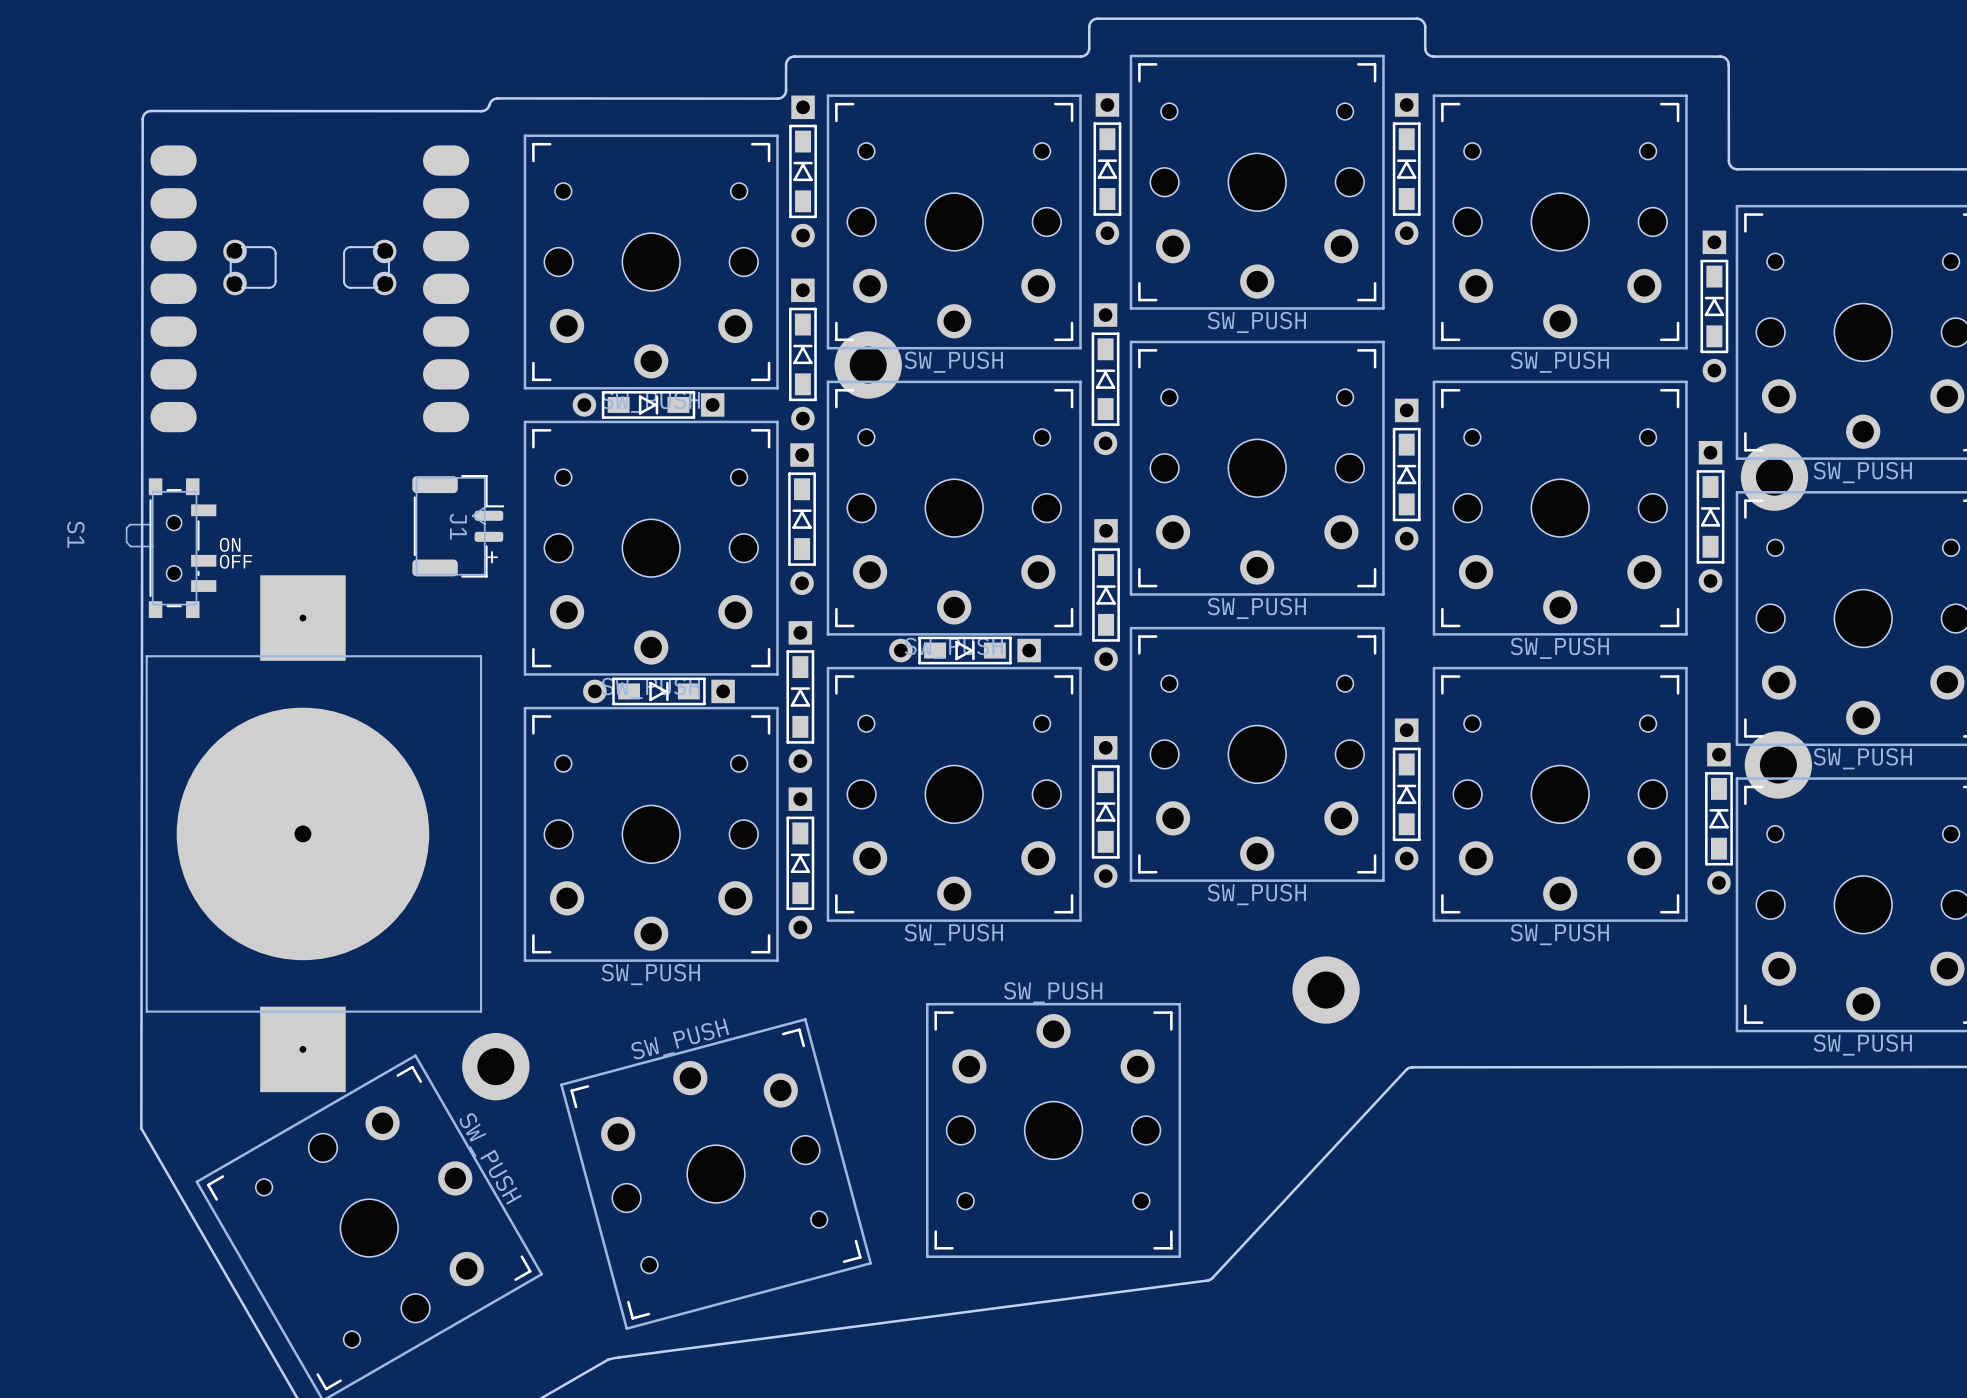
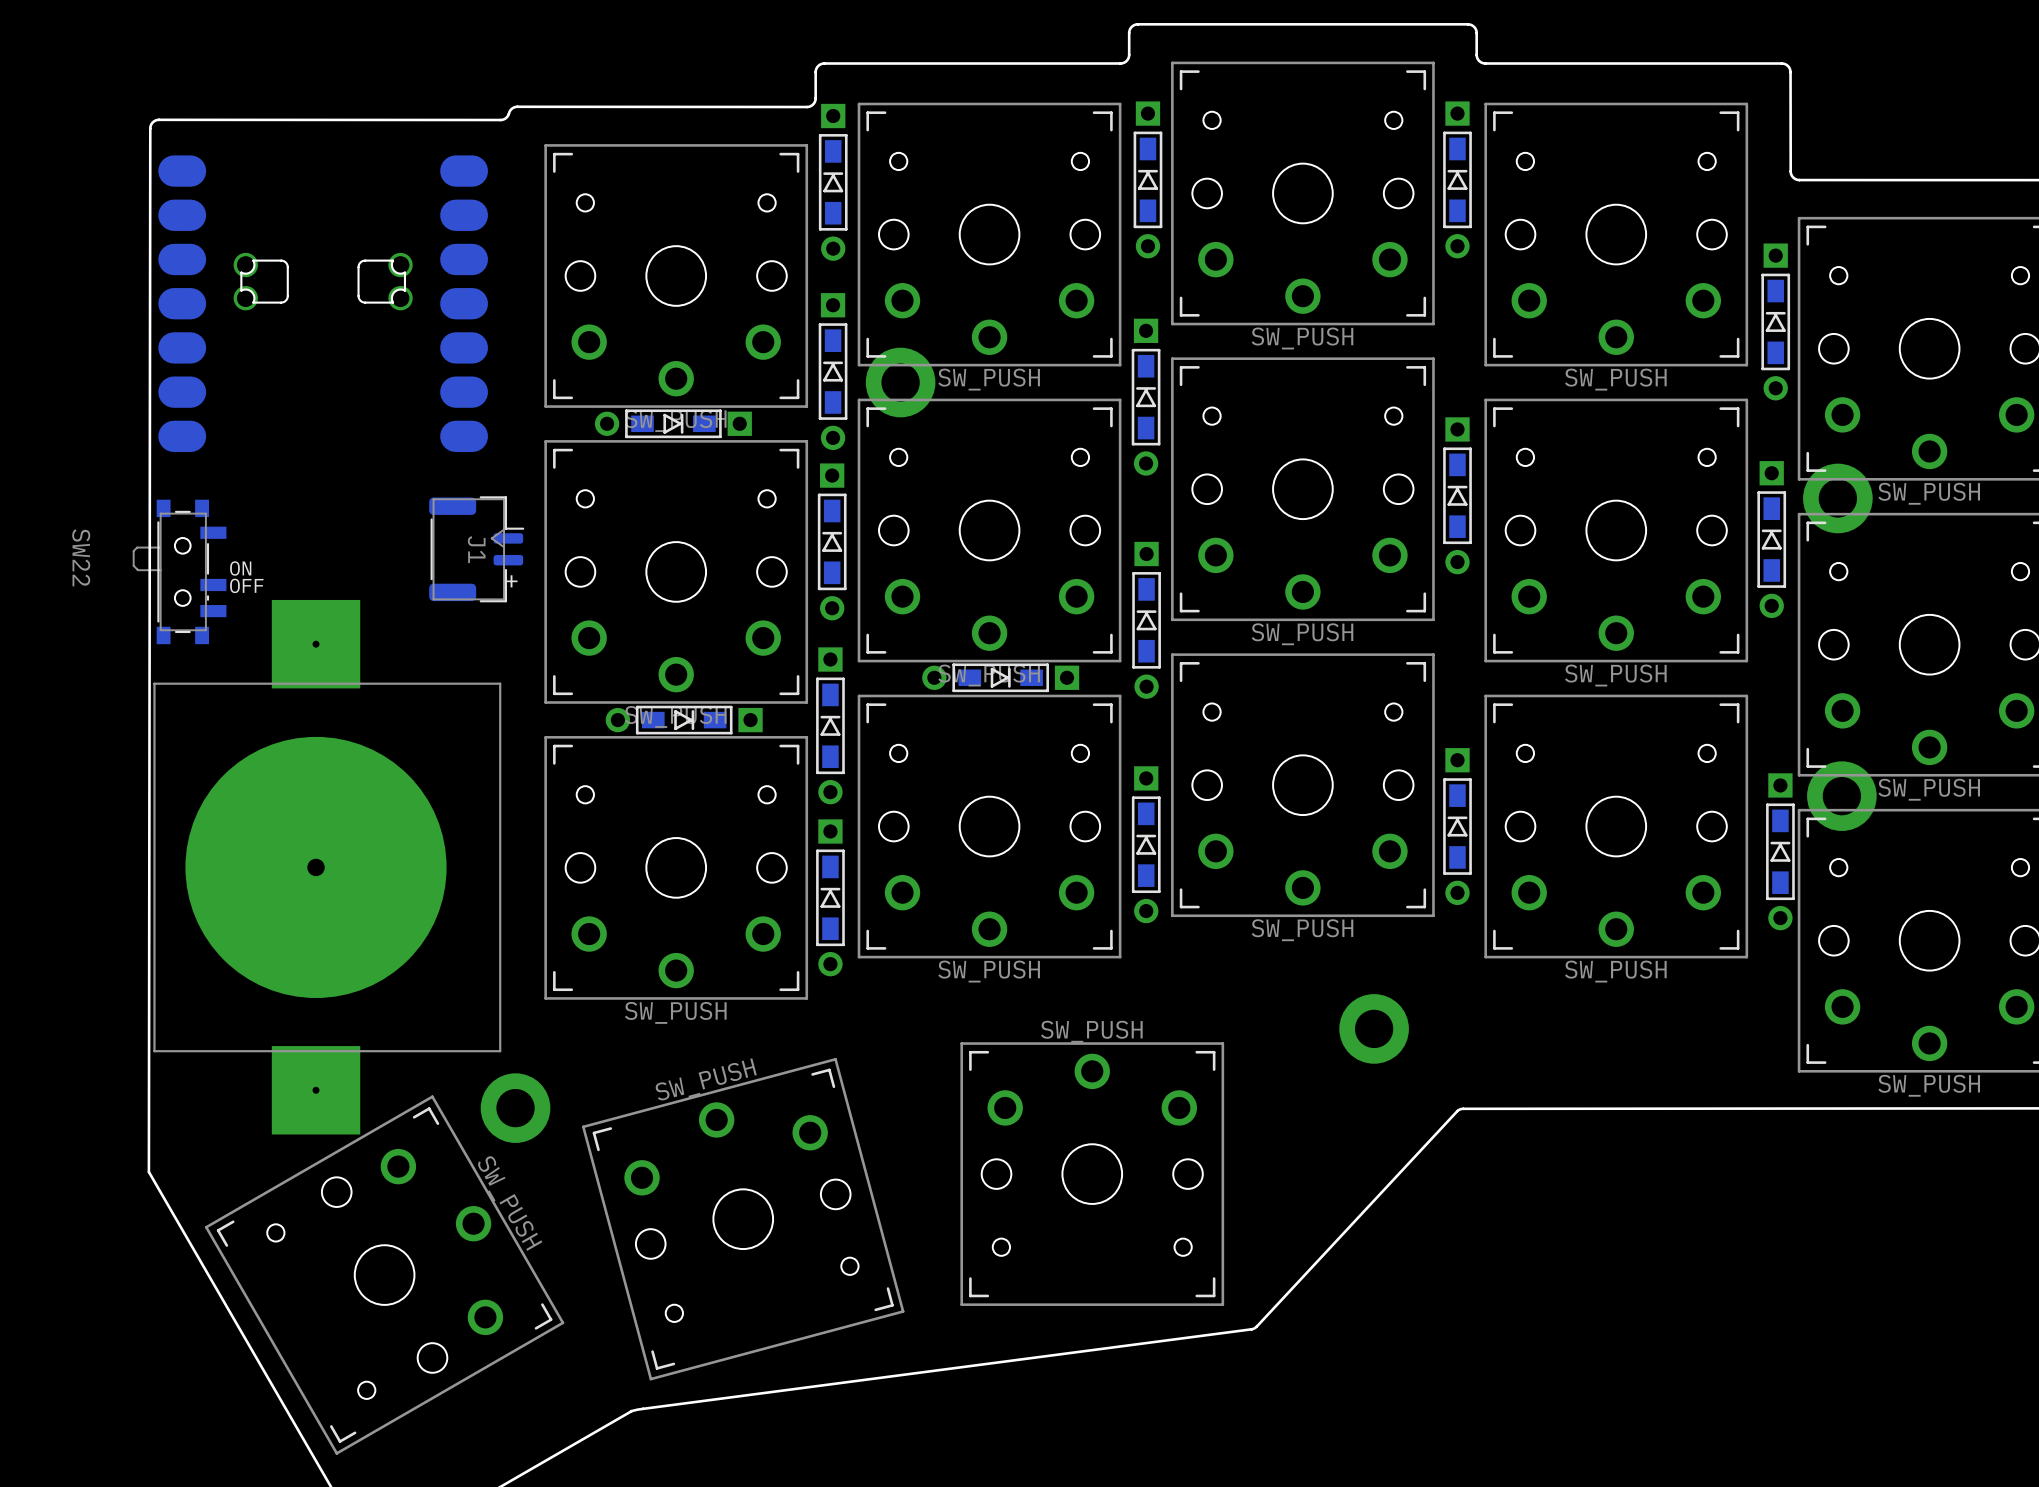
S1 name: S1 (75, 534) -> SW22 (81, 557)

